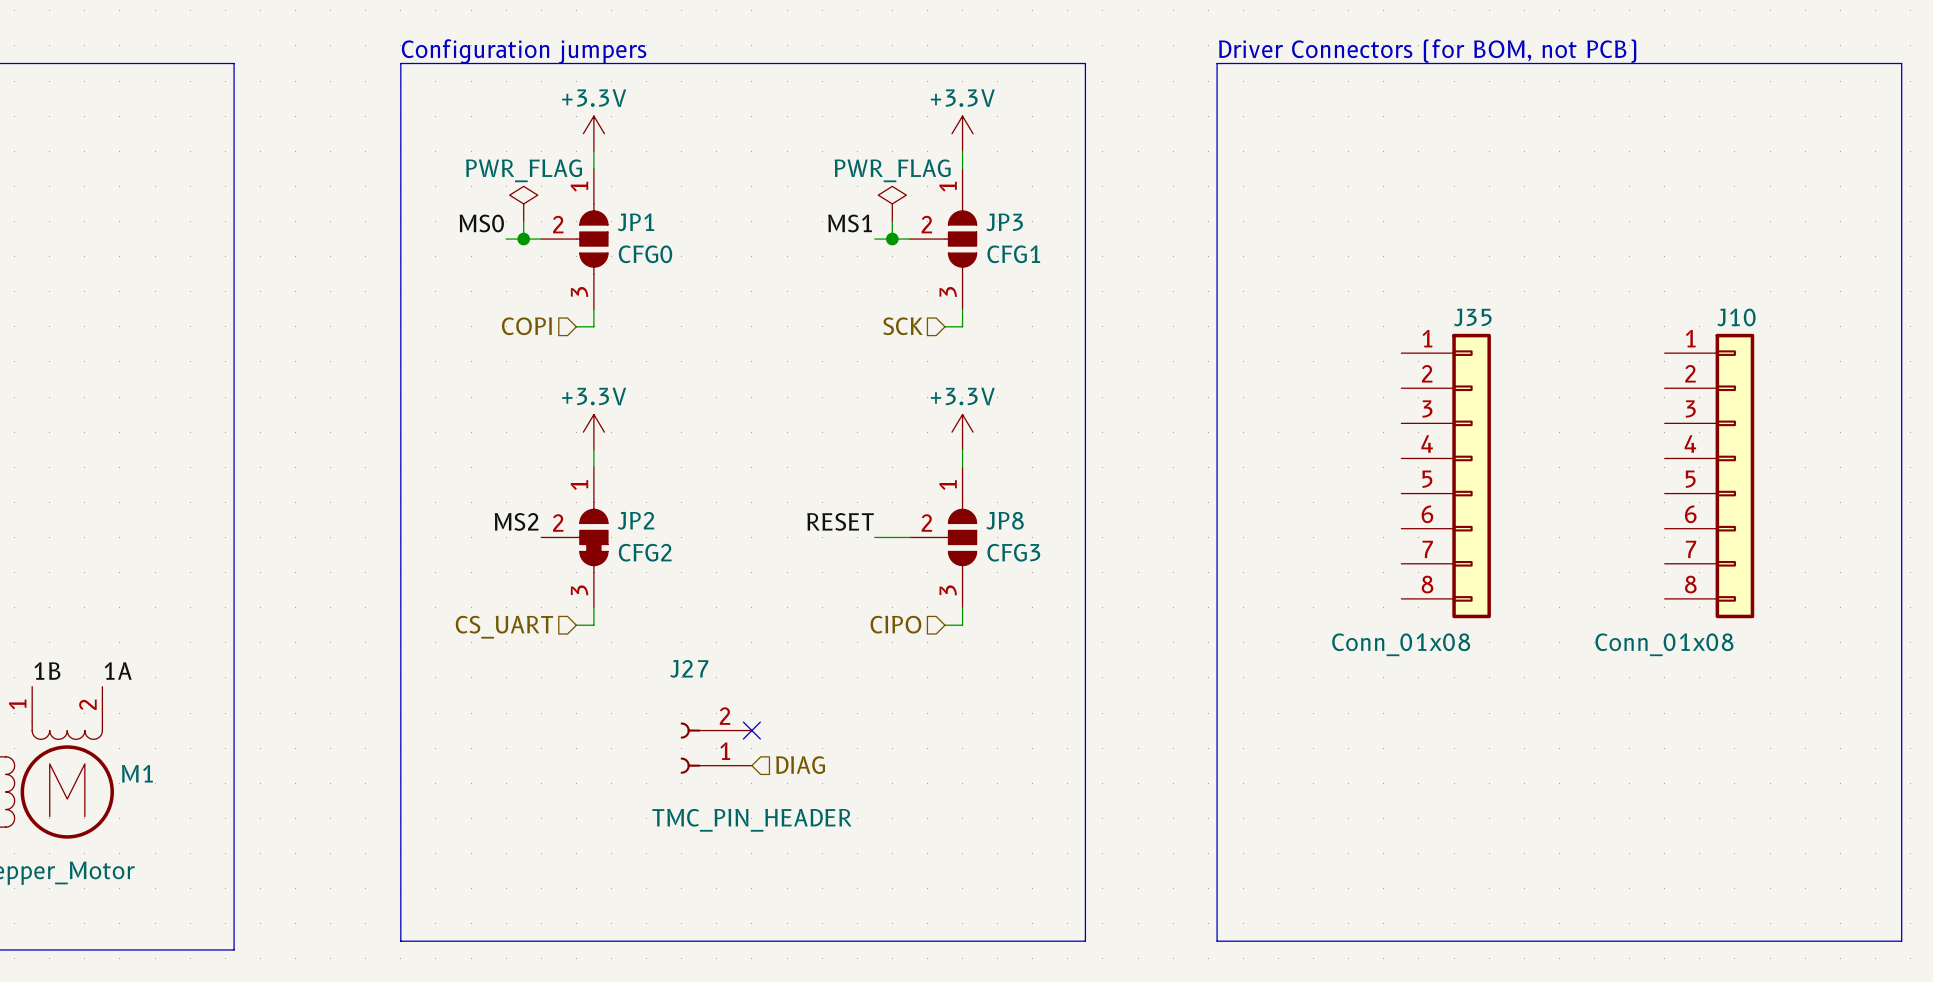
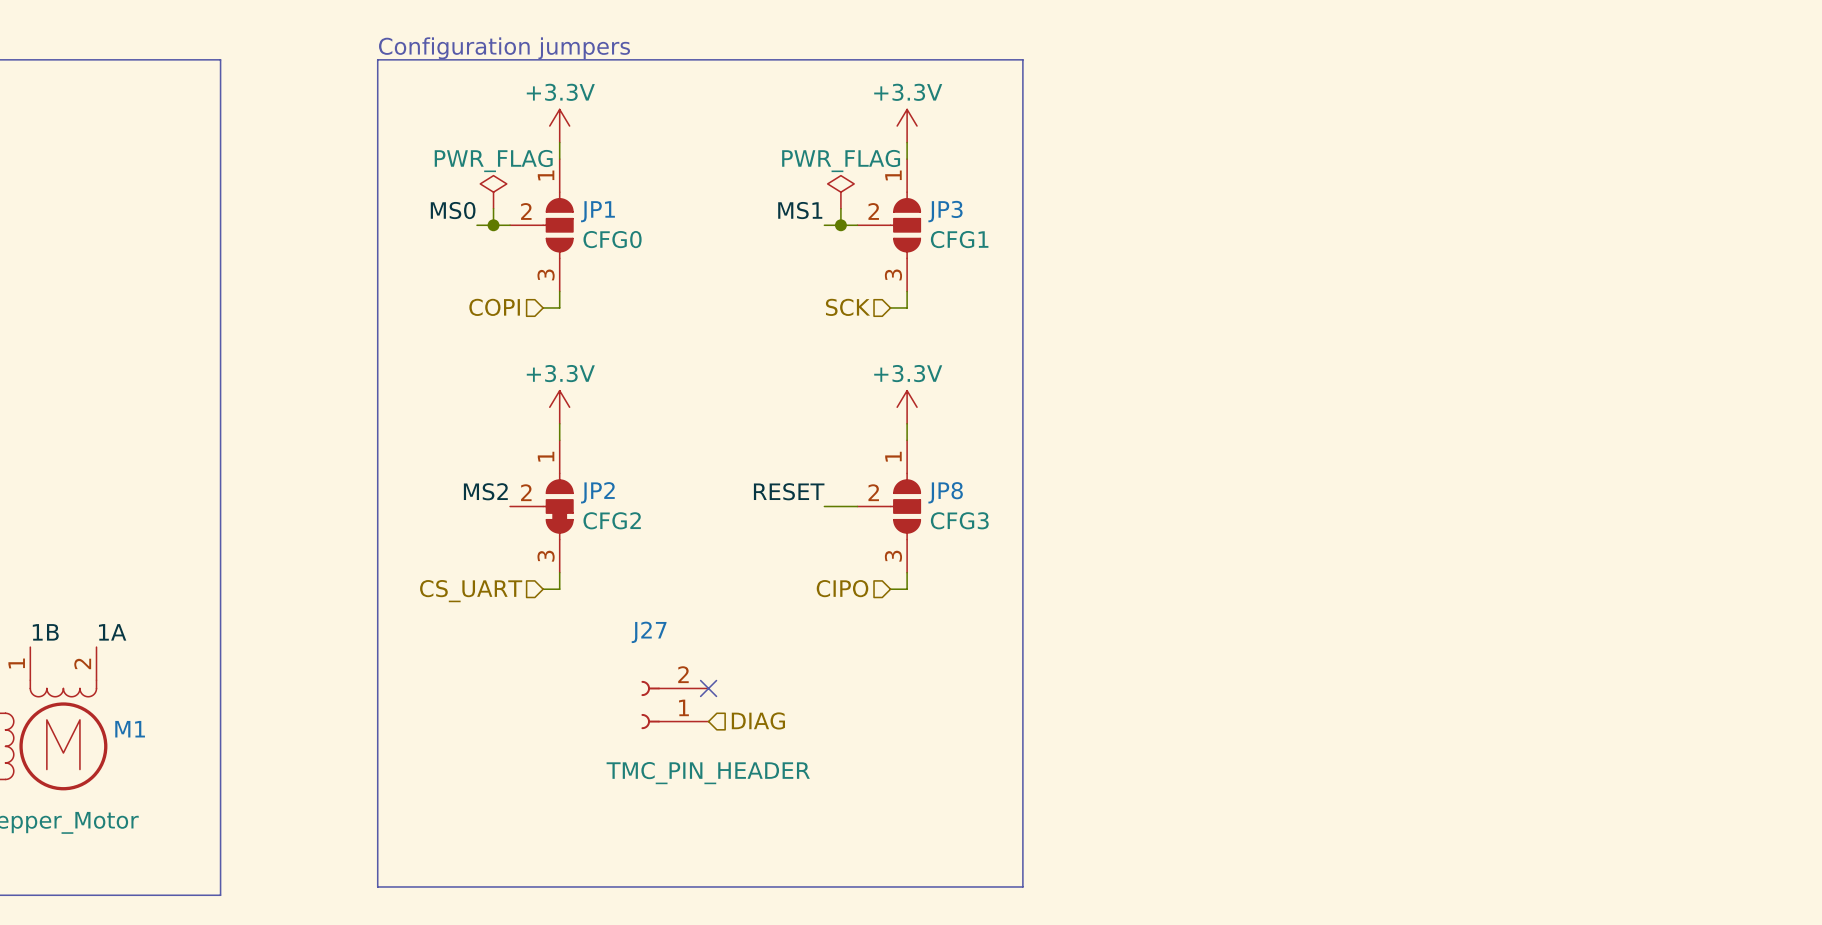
text: Driver Connectors (for BOM, not PCB) (1427, 50) -> none
line: (1217, 63) (1901, 63) (1901, 941) (1217, 941) (1217, 63) -> none
J35: Conn_01x08 (1446, 476) -> none
J10: Conn_01x08 (1709, 476) -> none

